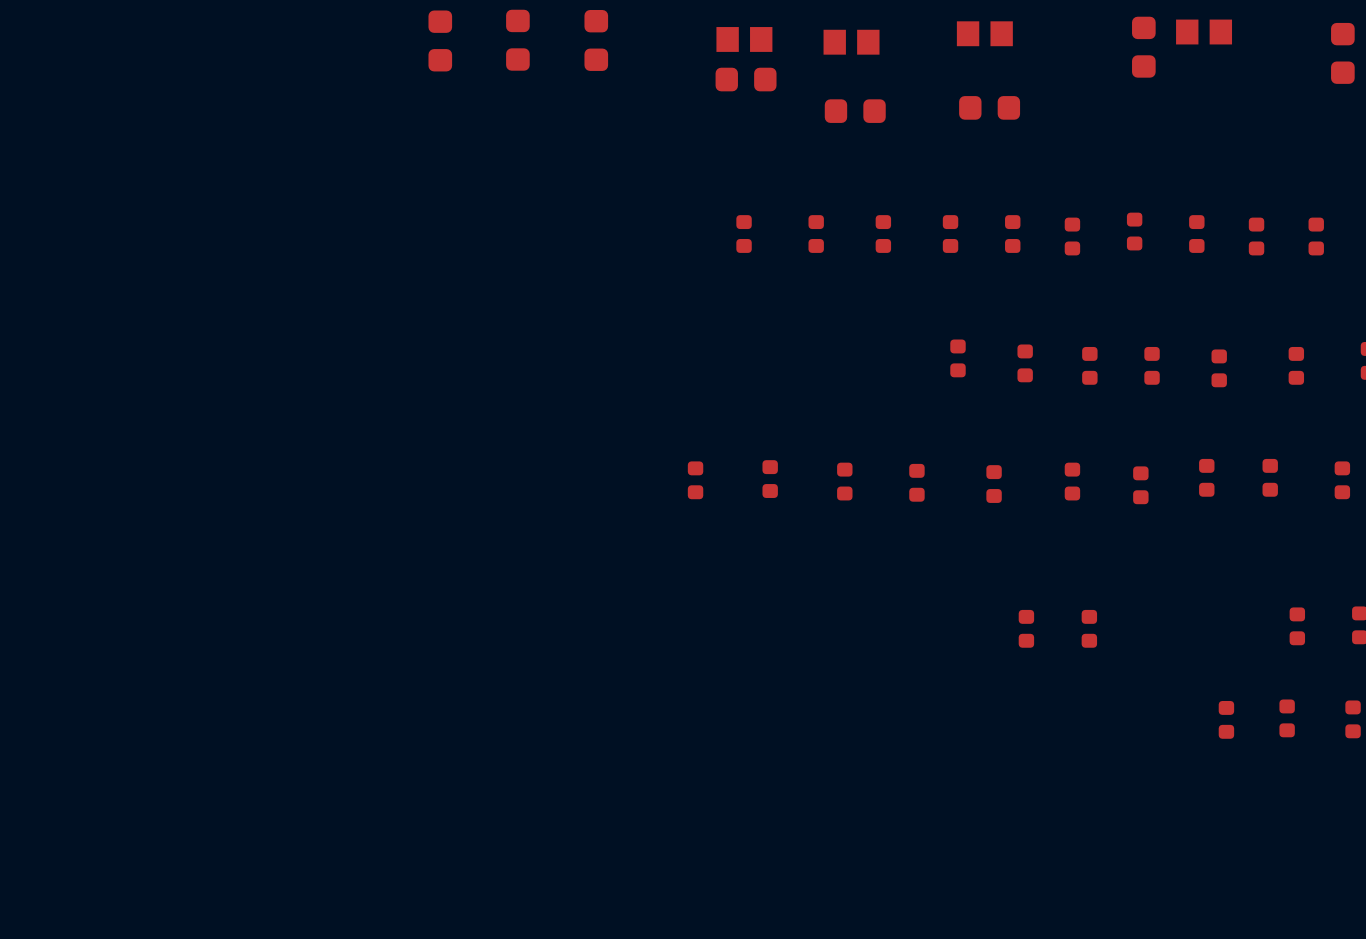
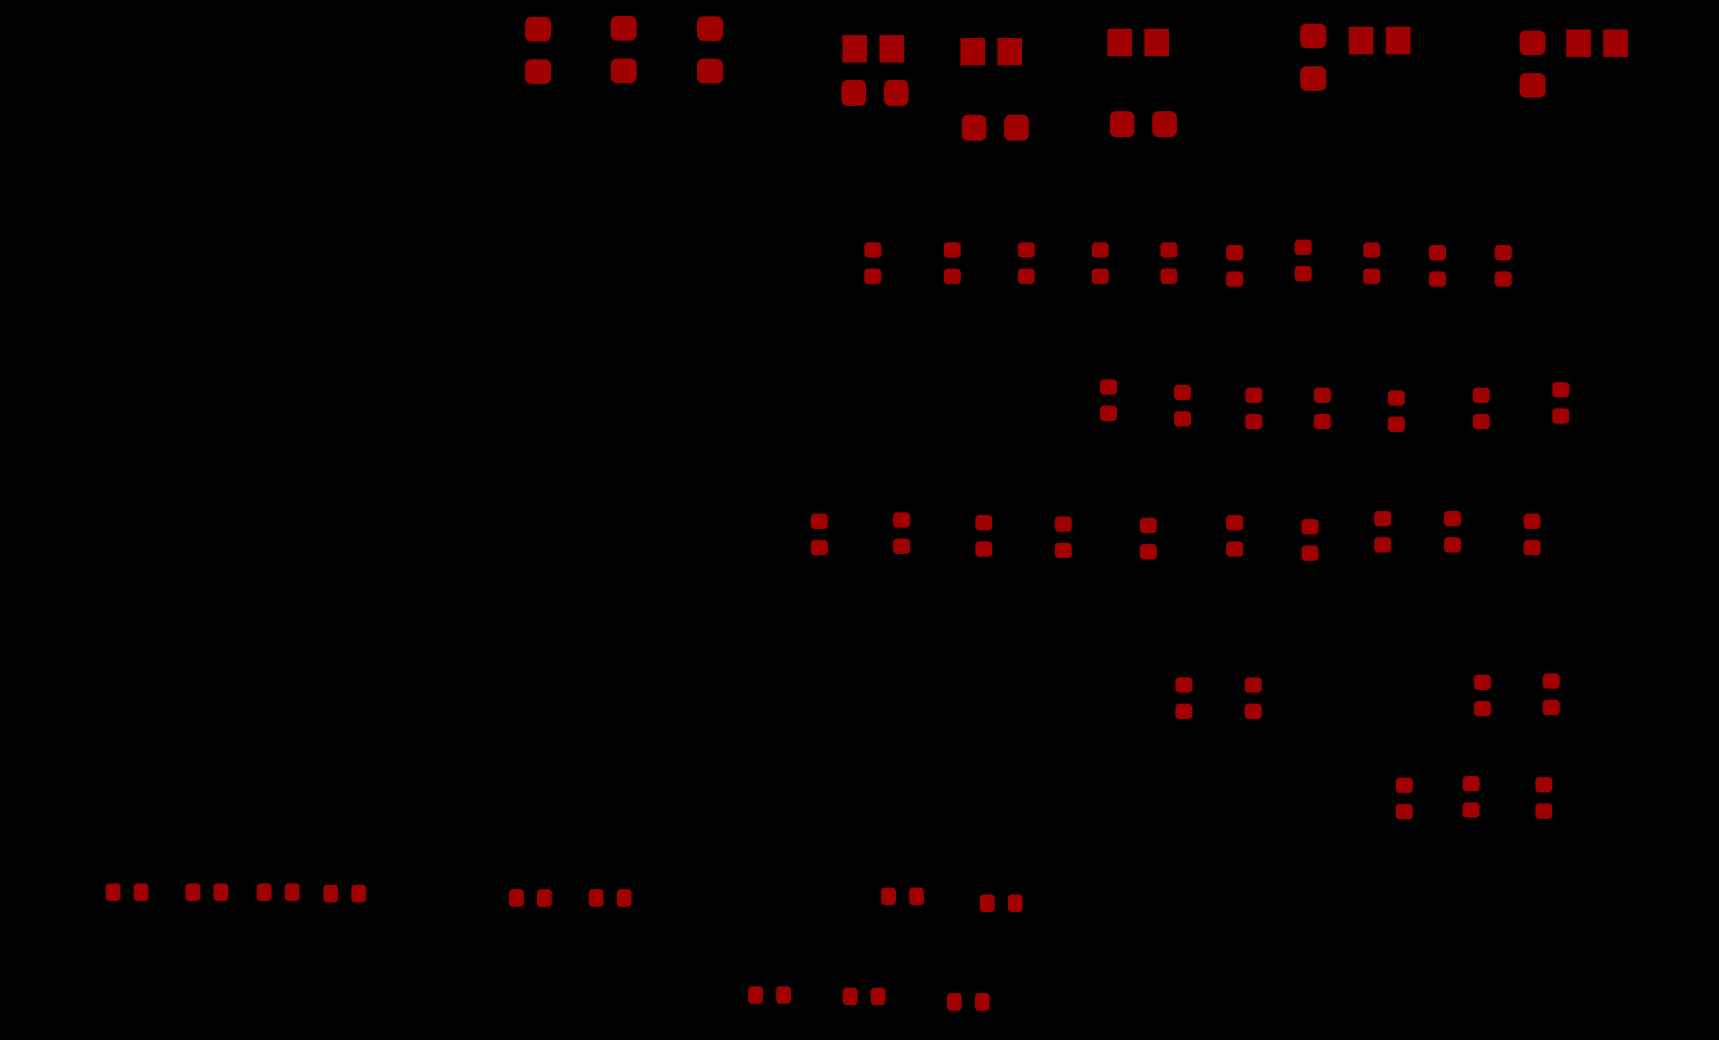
part: none -> (127, 892)
part: none -> (206, 892)
part: none -> (278, 892)
part: none -> (344, 893)
part: none -> (902, 896)
part: none -> (530, 897)
part: none -> (610, 897)
part: none -> (1001, 903)
part: none -> (769, 995)
part: none -> (864, 996)
part: none -> (968, 1001)

